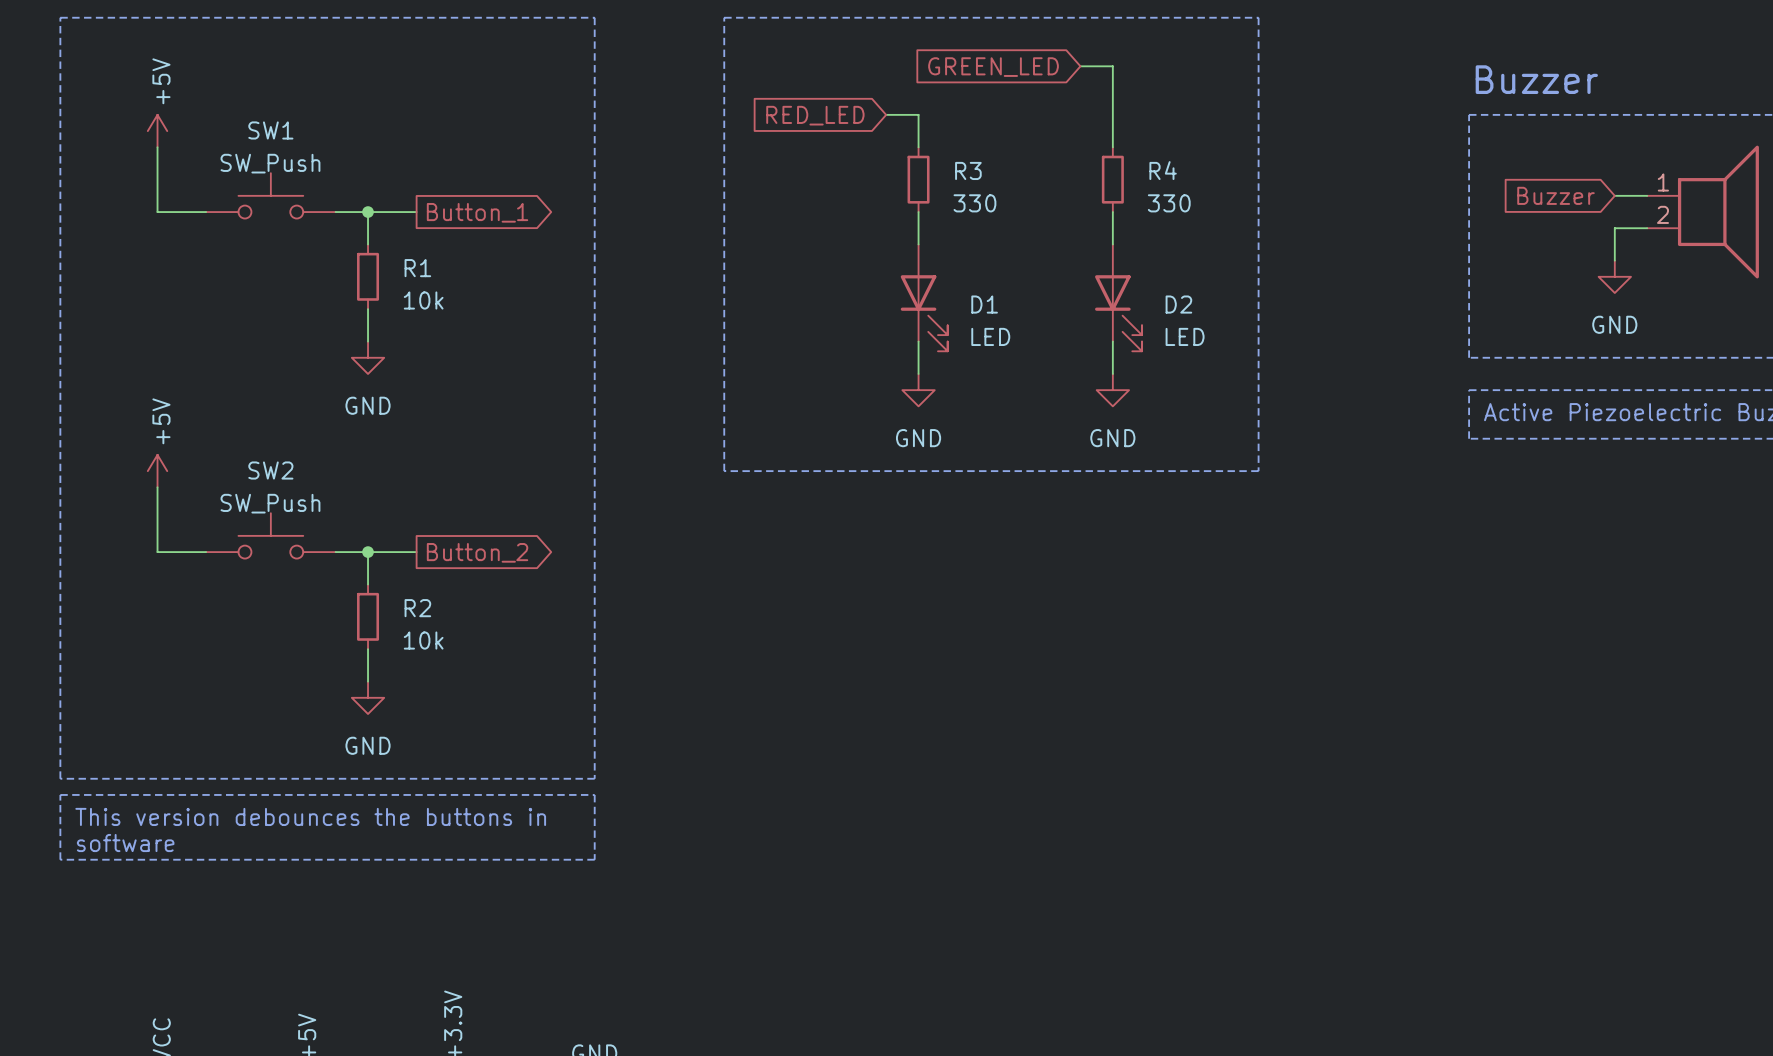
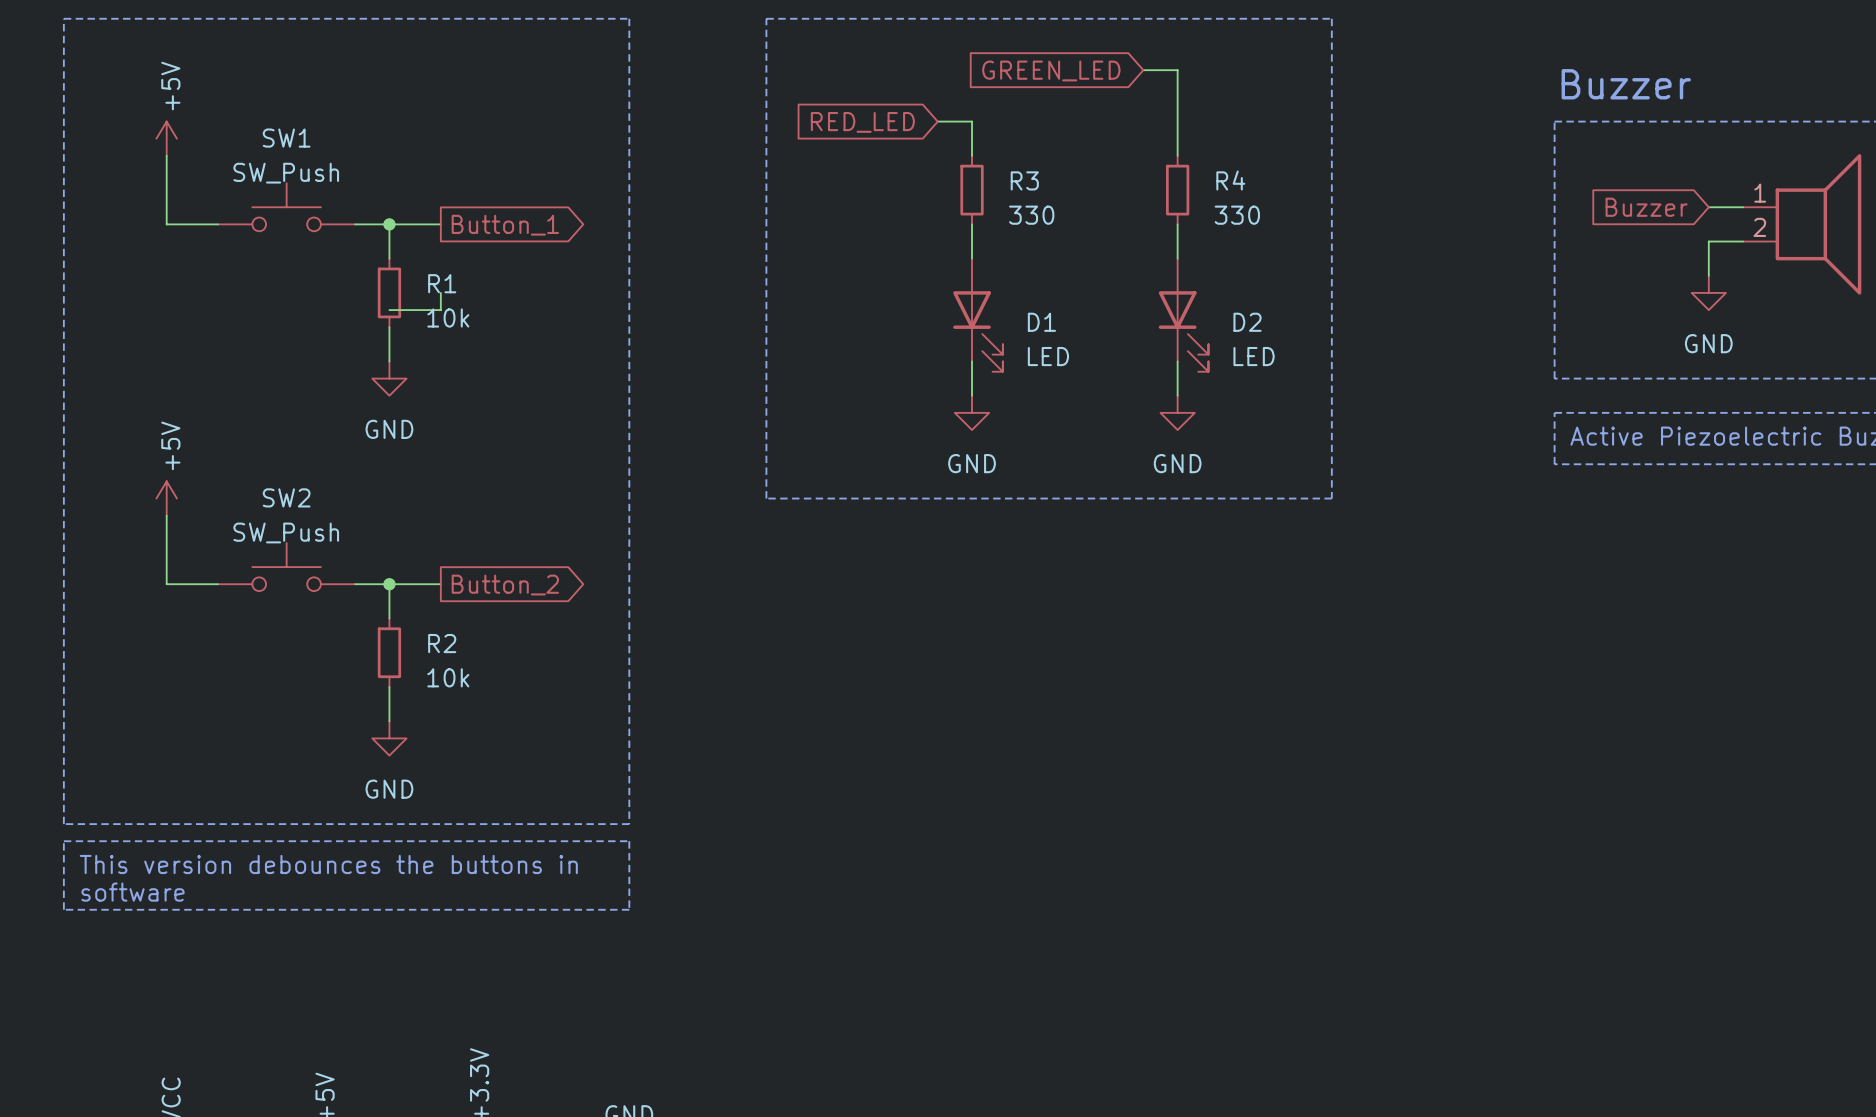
wire: none -> (440, 292) (440, 310) (389, 310)

